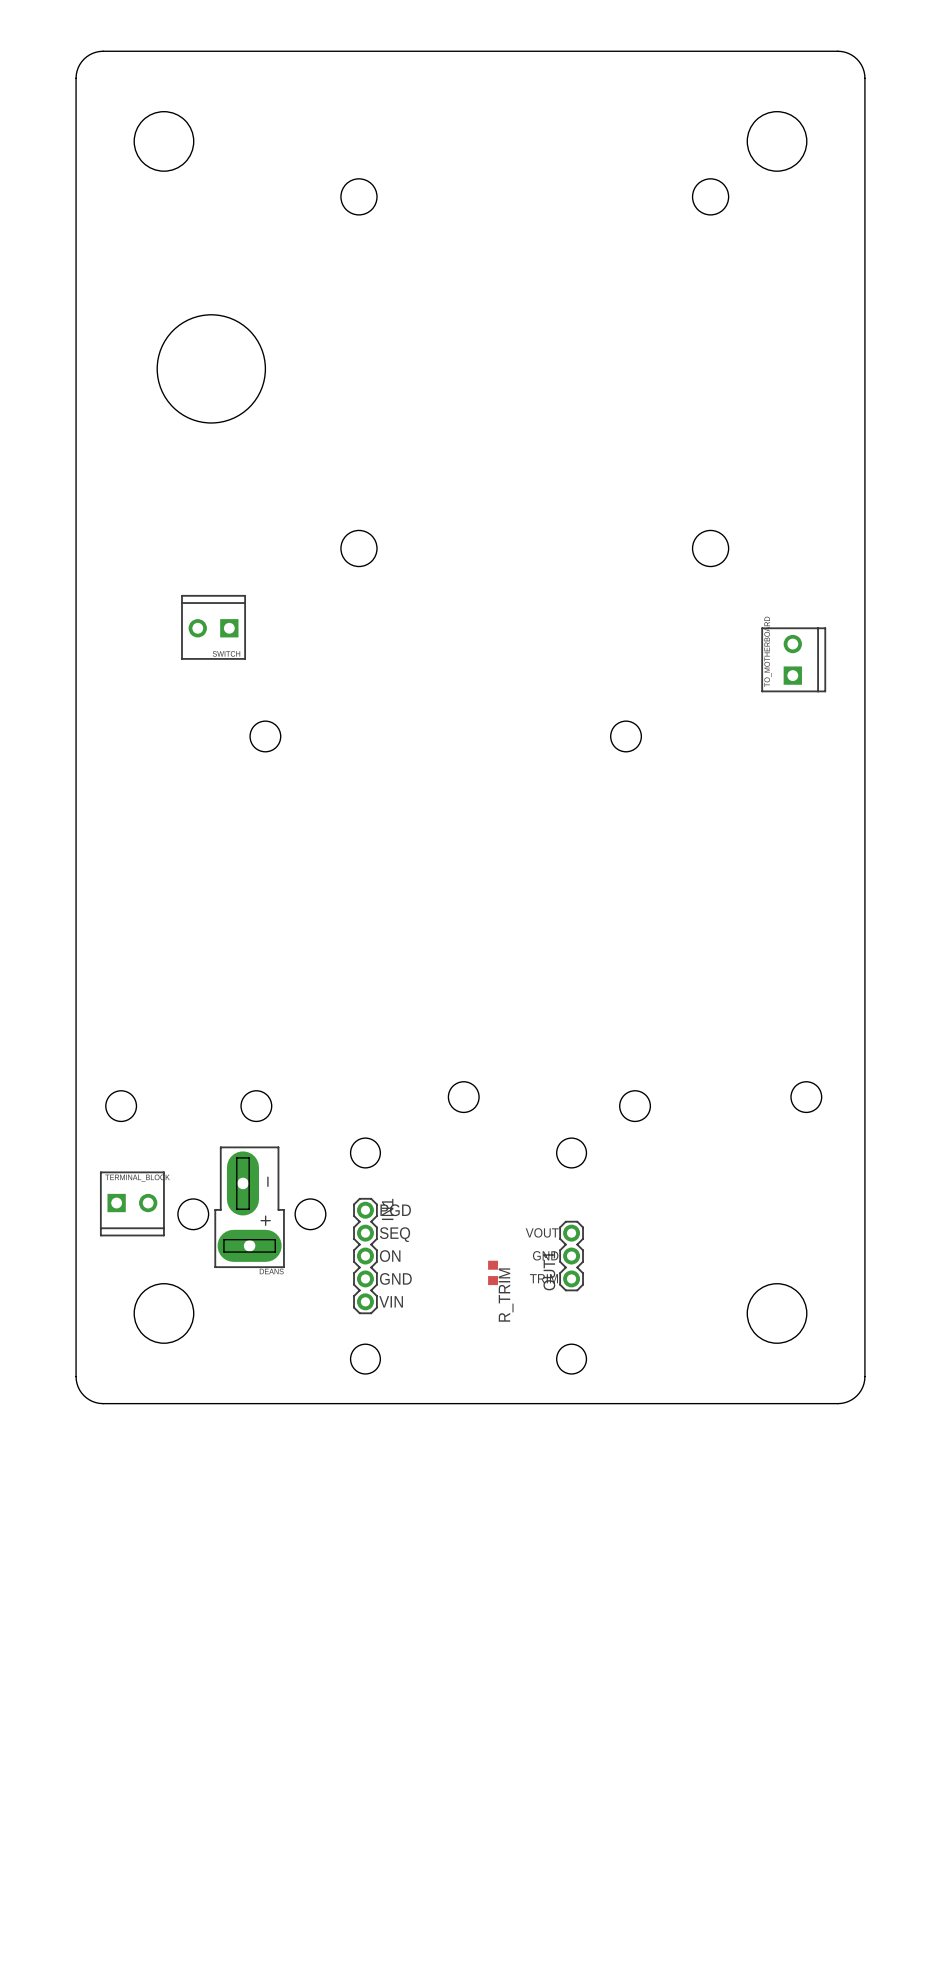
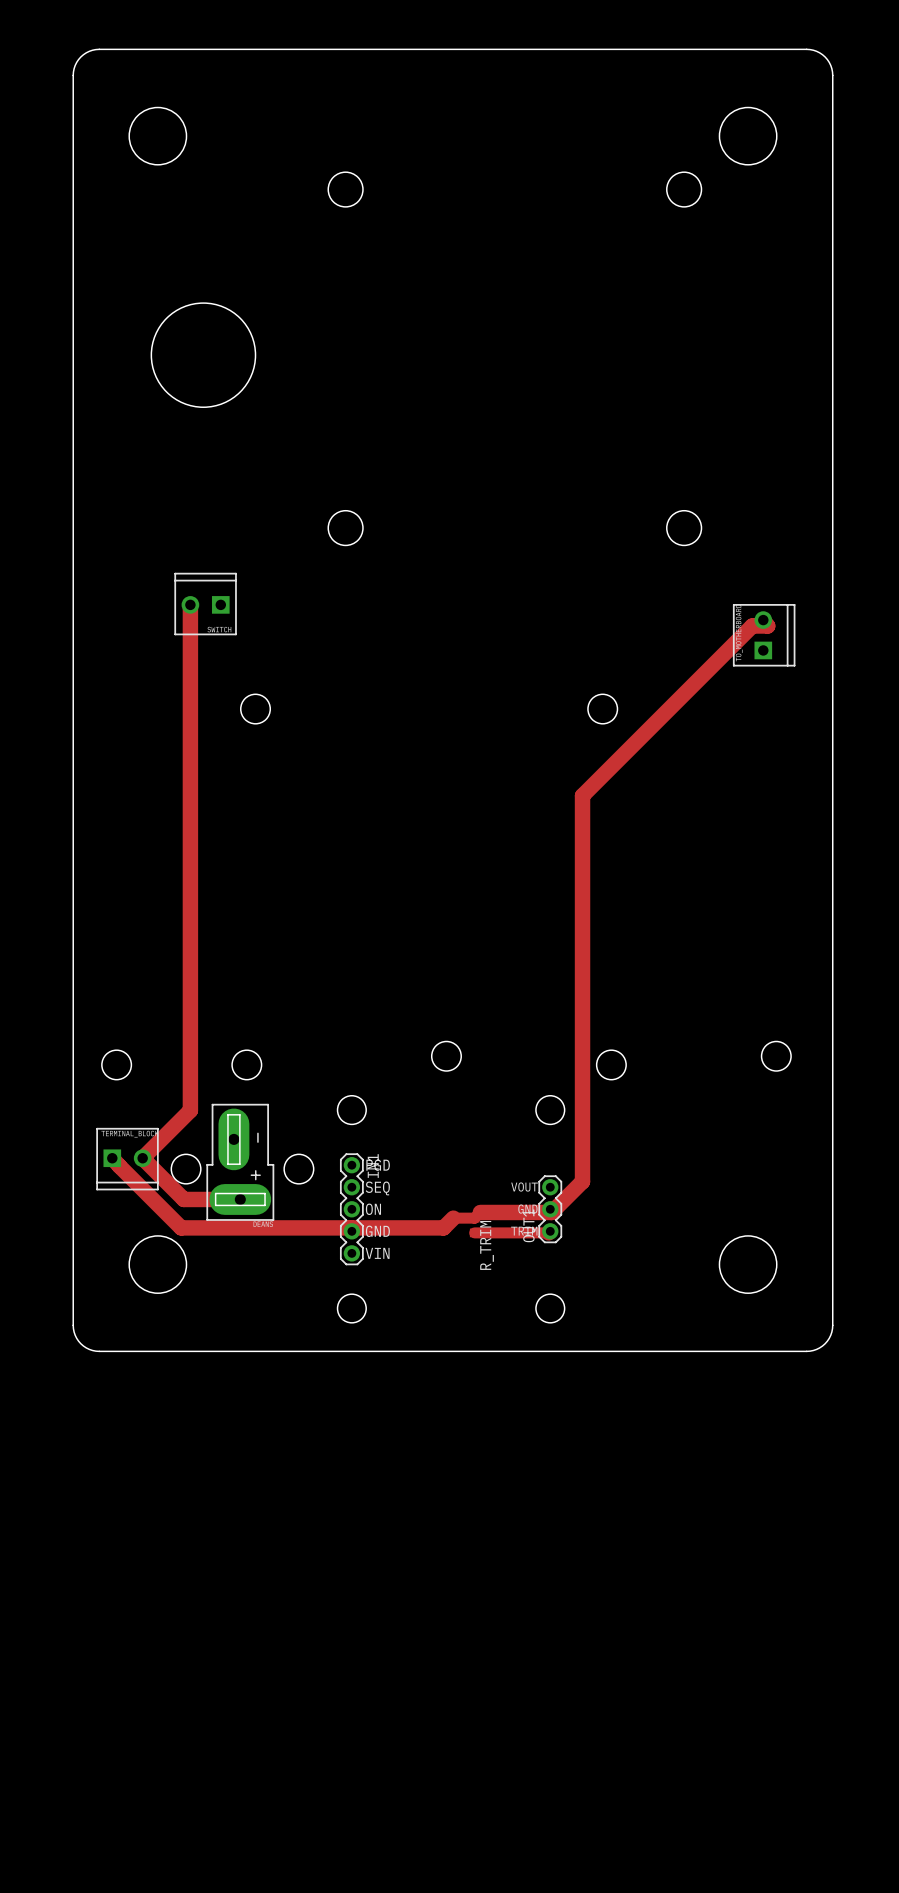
track: none -> (190, 604) (190, 1110) (142, 1158) (183, 1199) (240, 1199)
track: none -> (763, 620) (767, 626) (752, 626) (582, 795) (582, 1181) (551, 1212)
track: none -> (112, 1158) (181, 1227) (443, 1227) (453, 1218) (474, 1218) (480, 1212) (551, 1212)
track: none -> (550, 1231) (548, 1232) (474, 1232)

